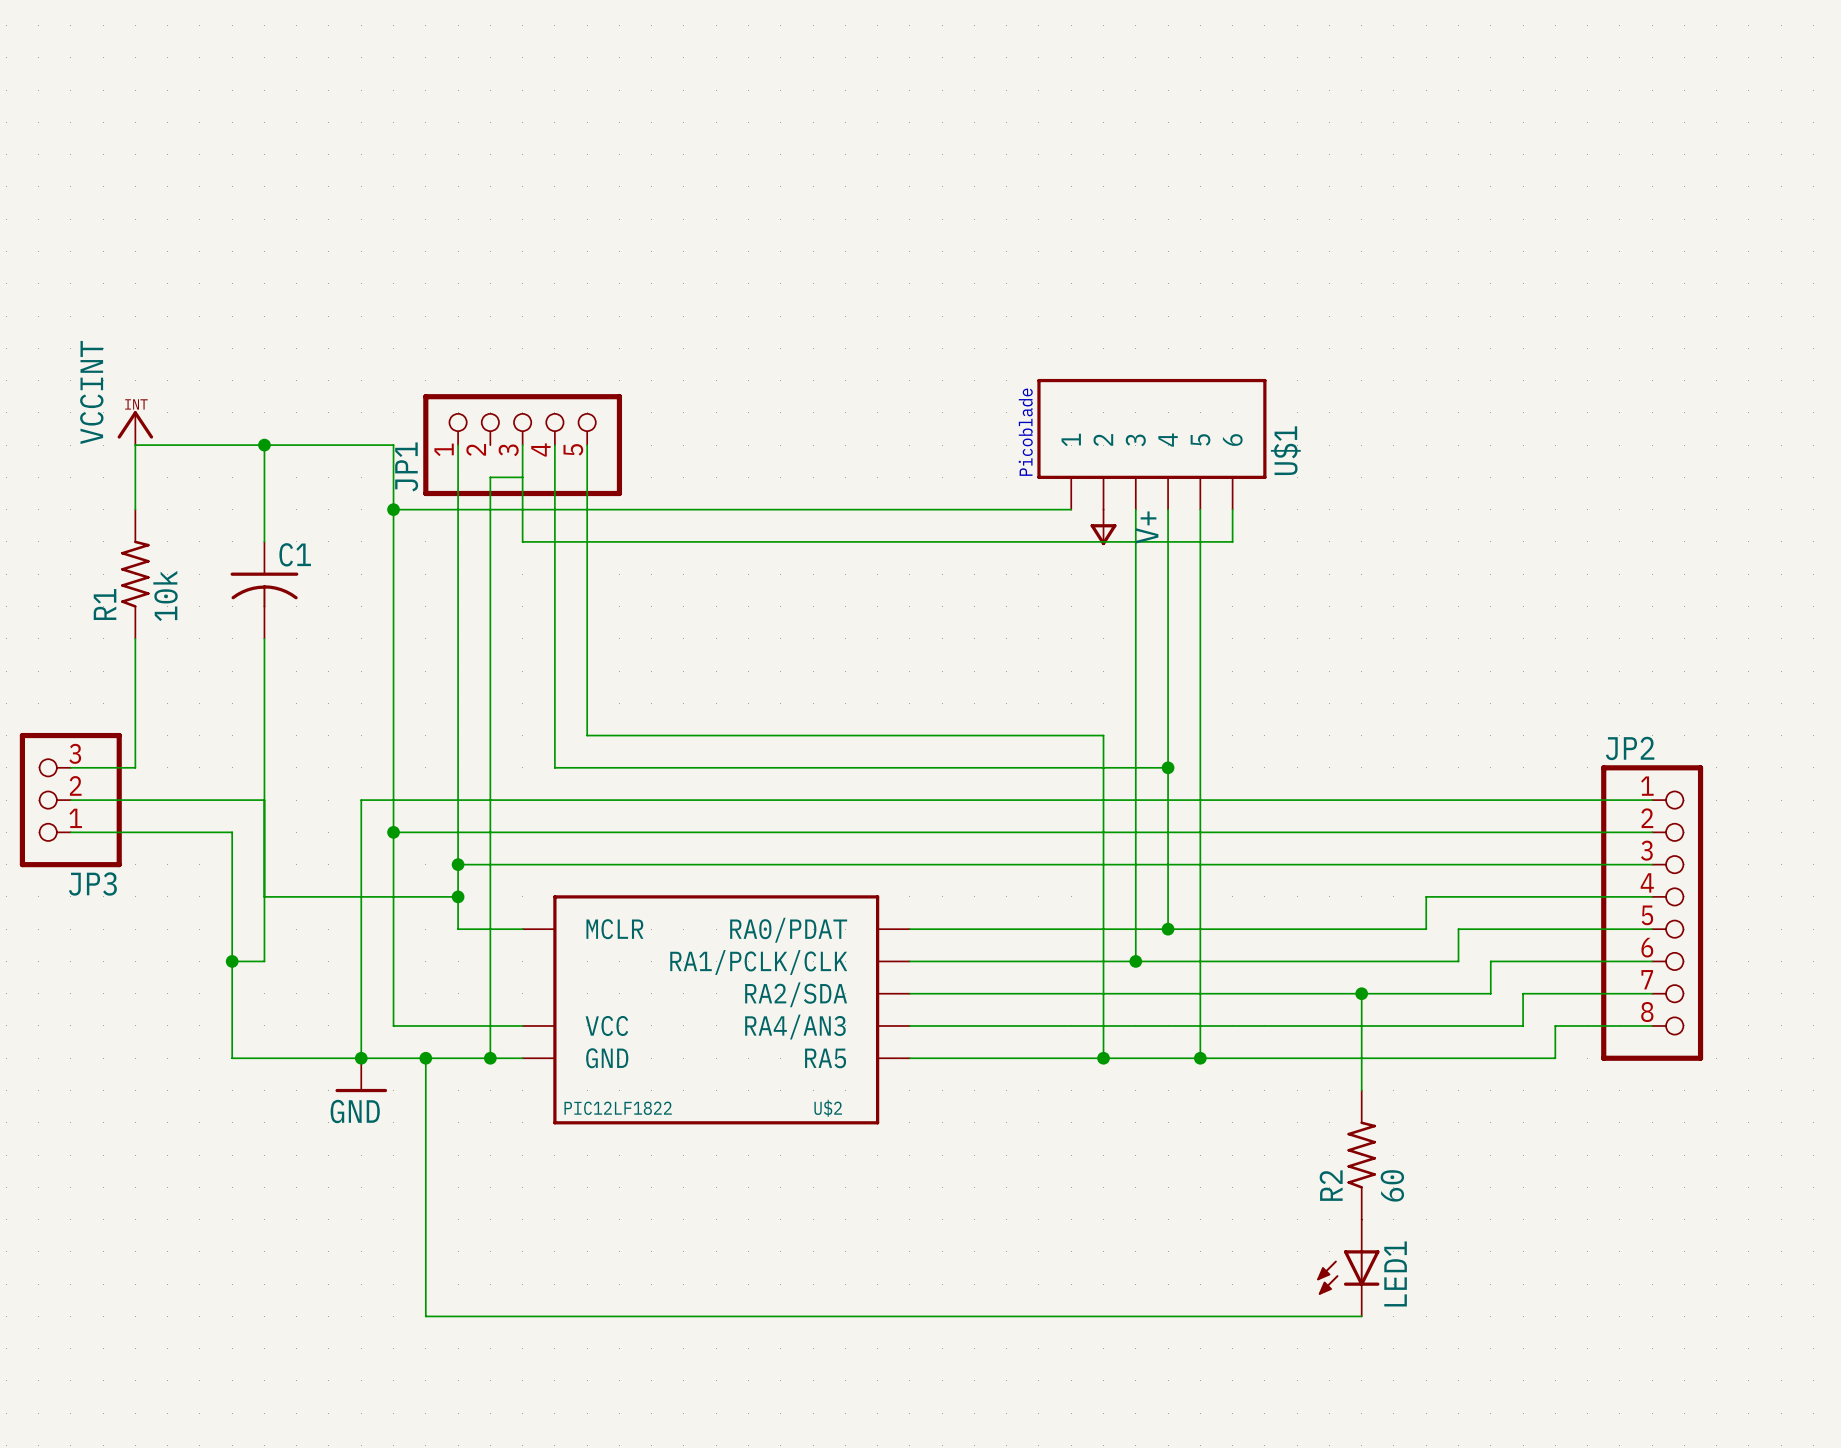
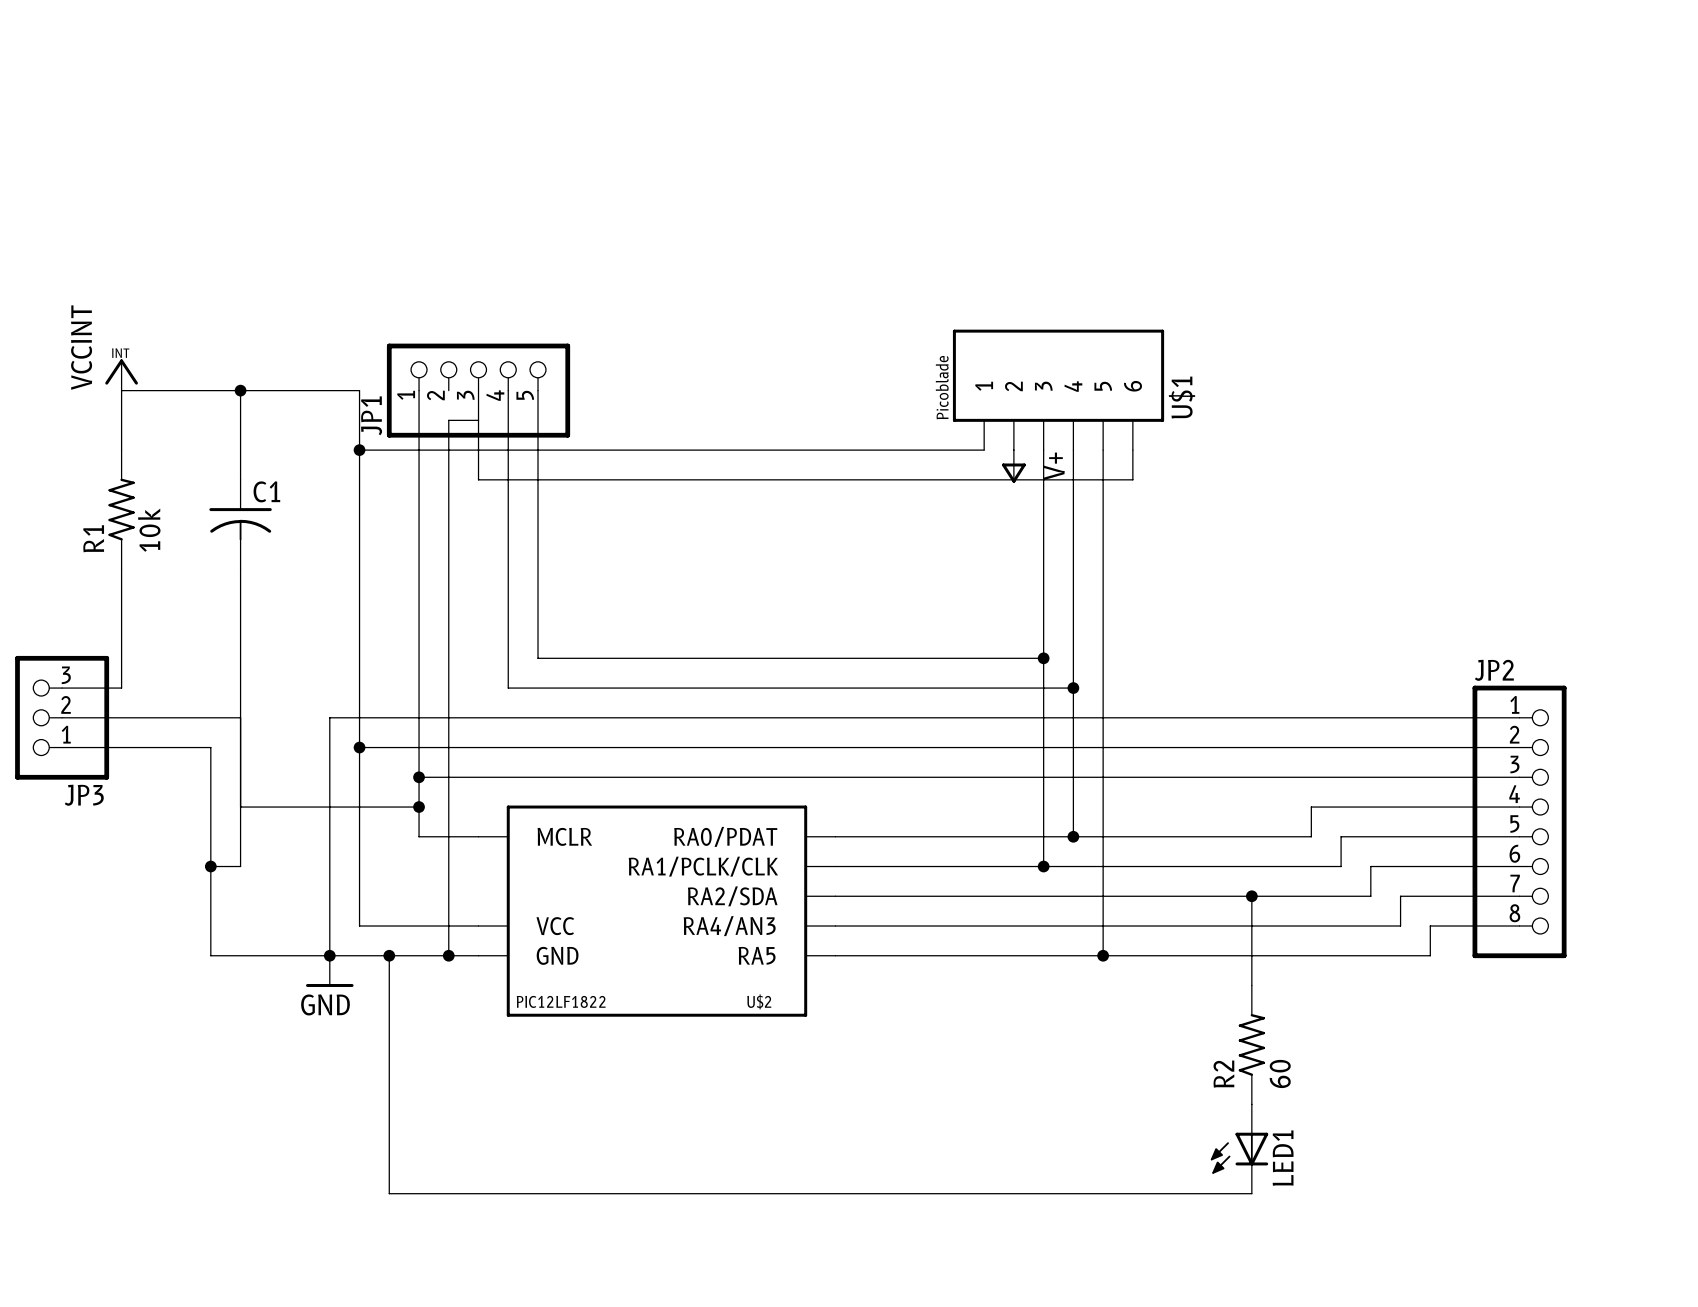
wire: (1103, 735) (1103, 1058) -> (1013, 658) (1043, 658)
junction: none -> (1043, 658)
junction: (1103, 1058) -> none

